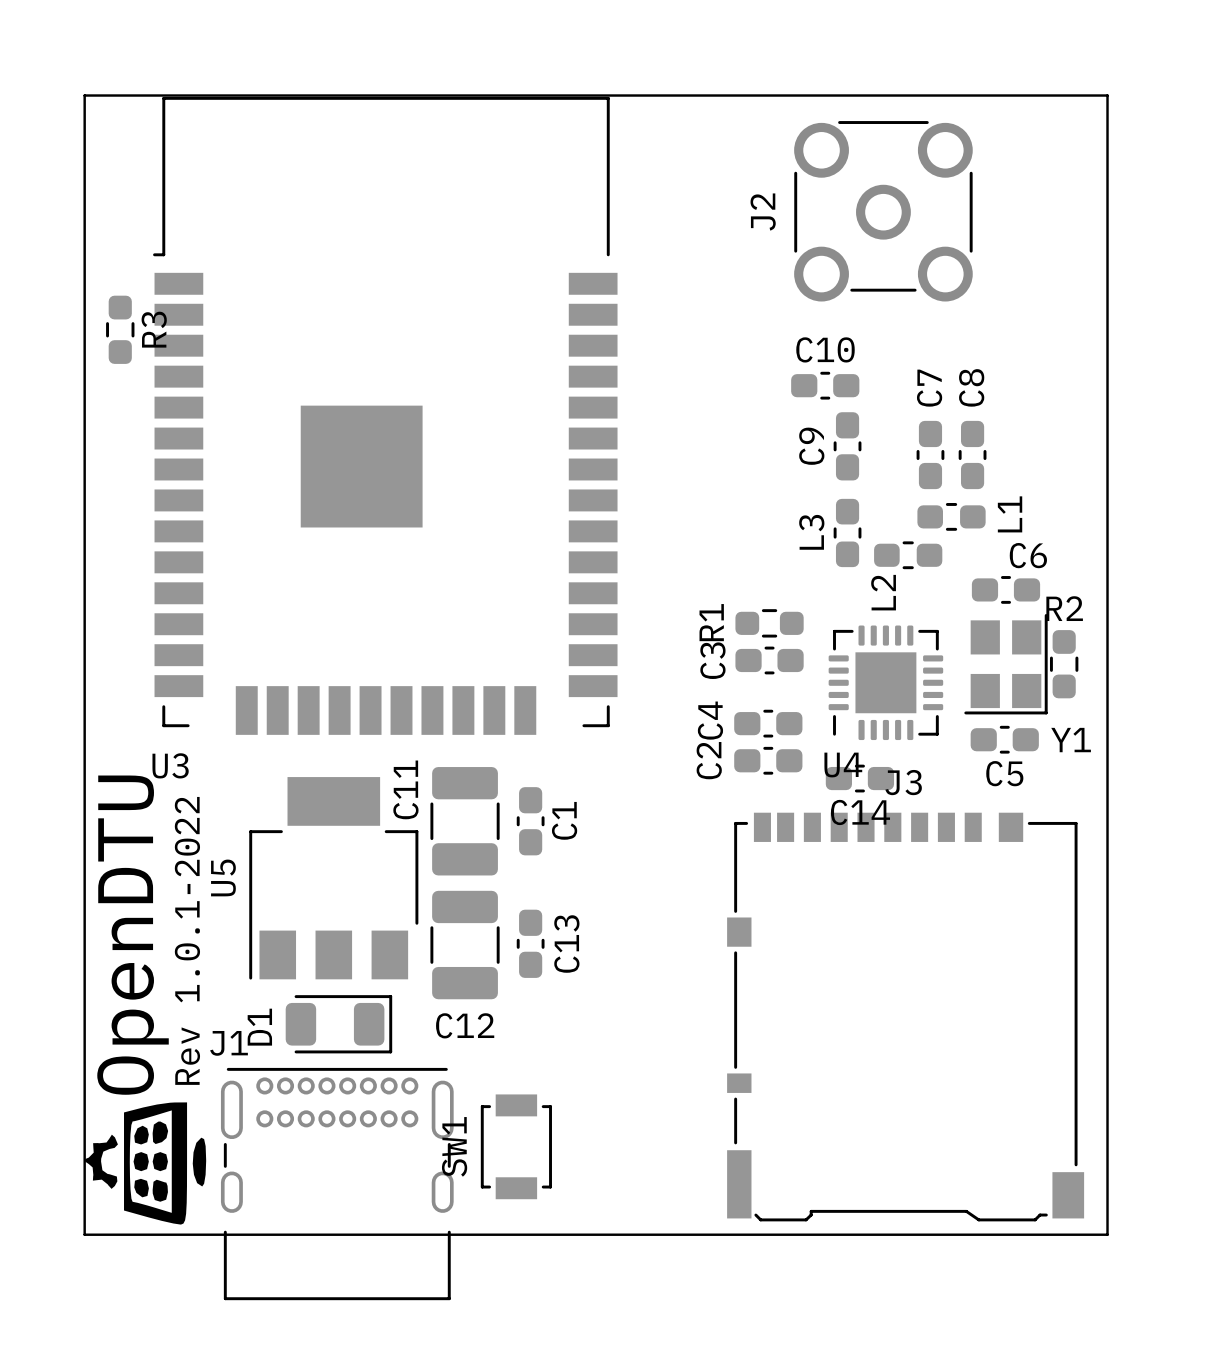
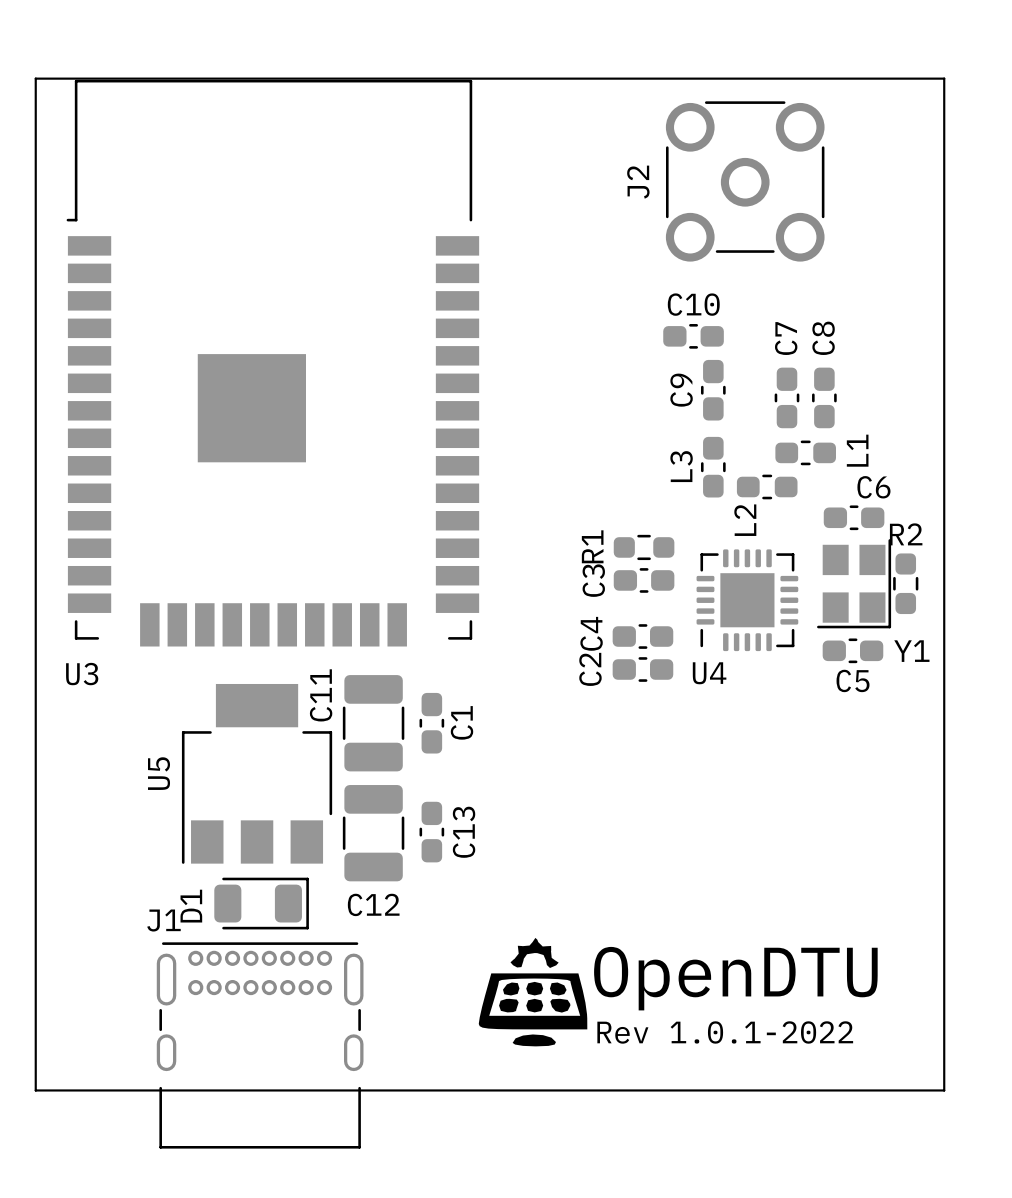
R3: (120, 329) -> none
U3 position: (385, 415) -> (272, 363)
C14: (859, 778) -> none
text rotation: 0° (133, 935) -> 90° clockwise (735, 978)
text position: OpenDTU (133, 935) -> OpenDTU (735, 978)
text rotation: 0° (187, 940) -> 90° clockwise (725, 1032)
text position: Rev 1.0.1-2022 (187, 940) -> Rev 1.0.1-2022 (725, 1032)
J3: (905, 1017) -> none
drawing: none -> [478, 937, 588, 1047]
drawing: [84, 1102, 207, 1225] -> none
SW1: (516, 1146) -> none

